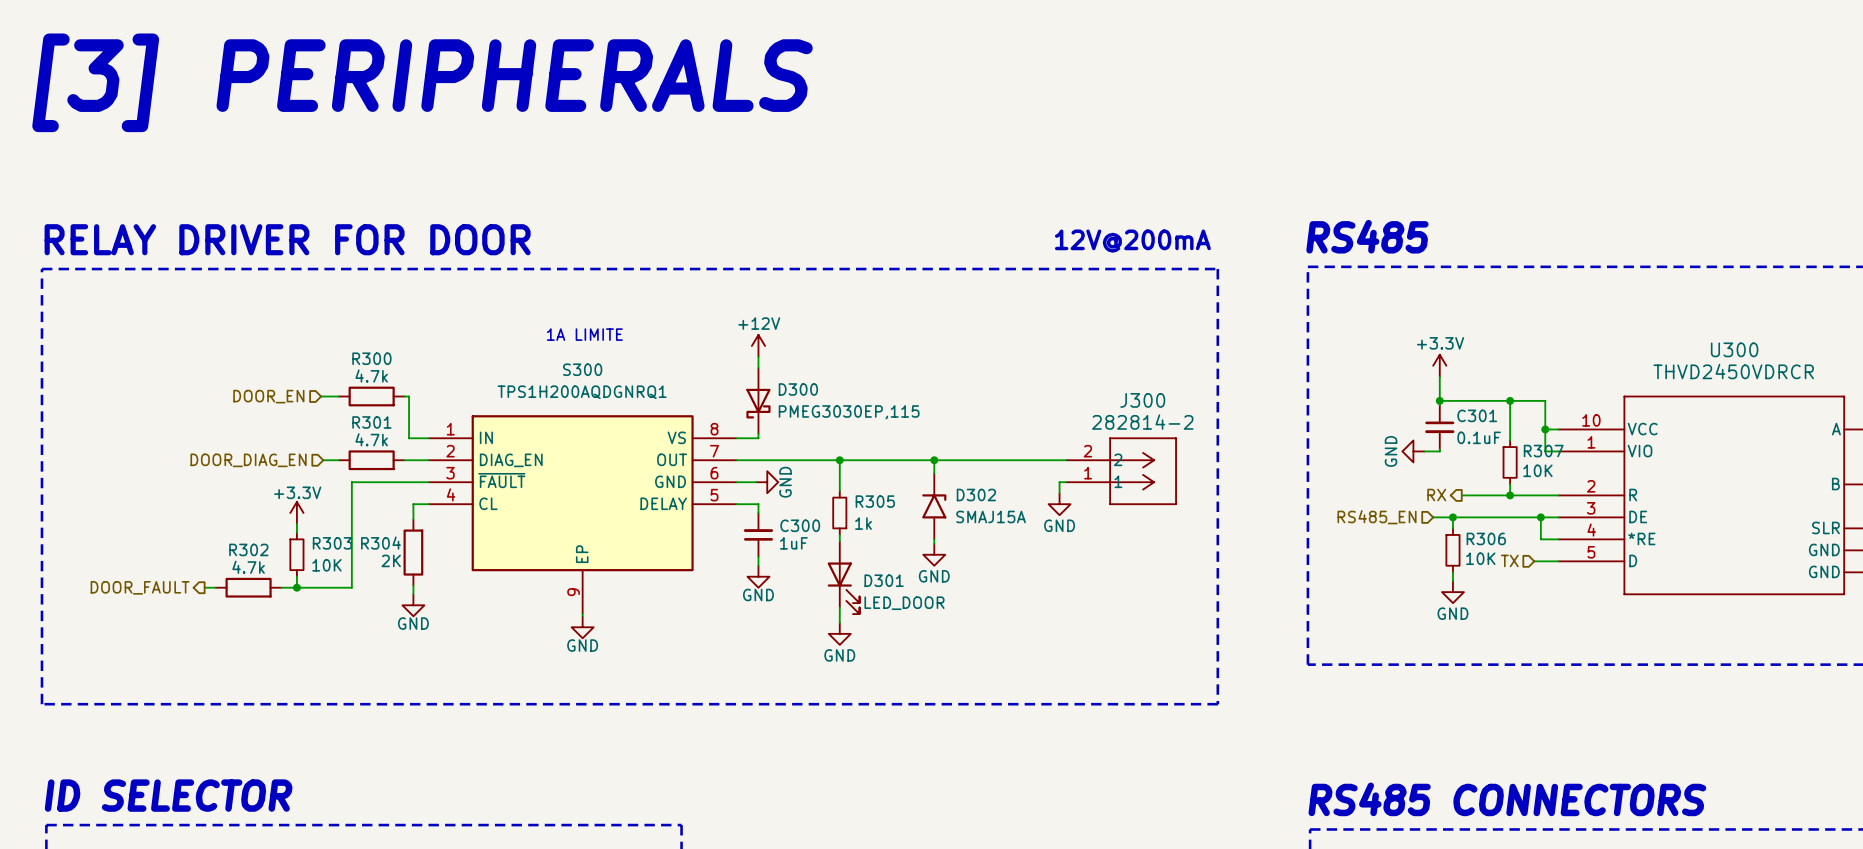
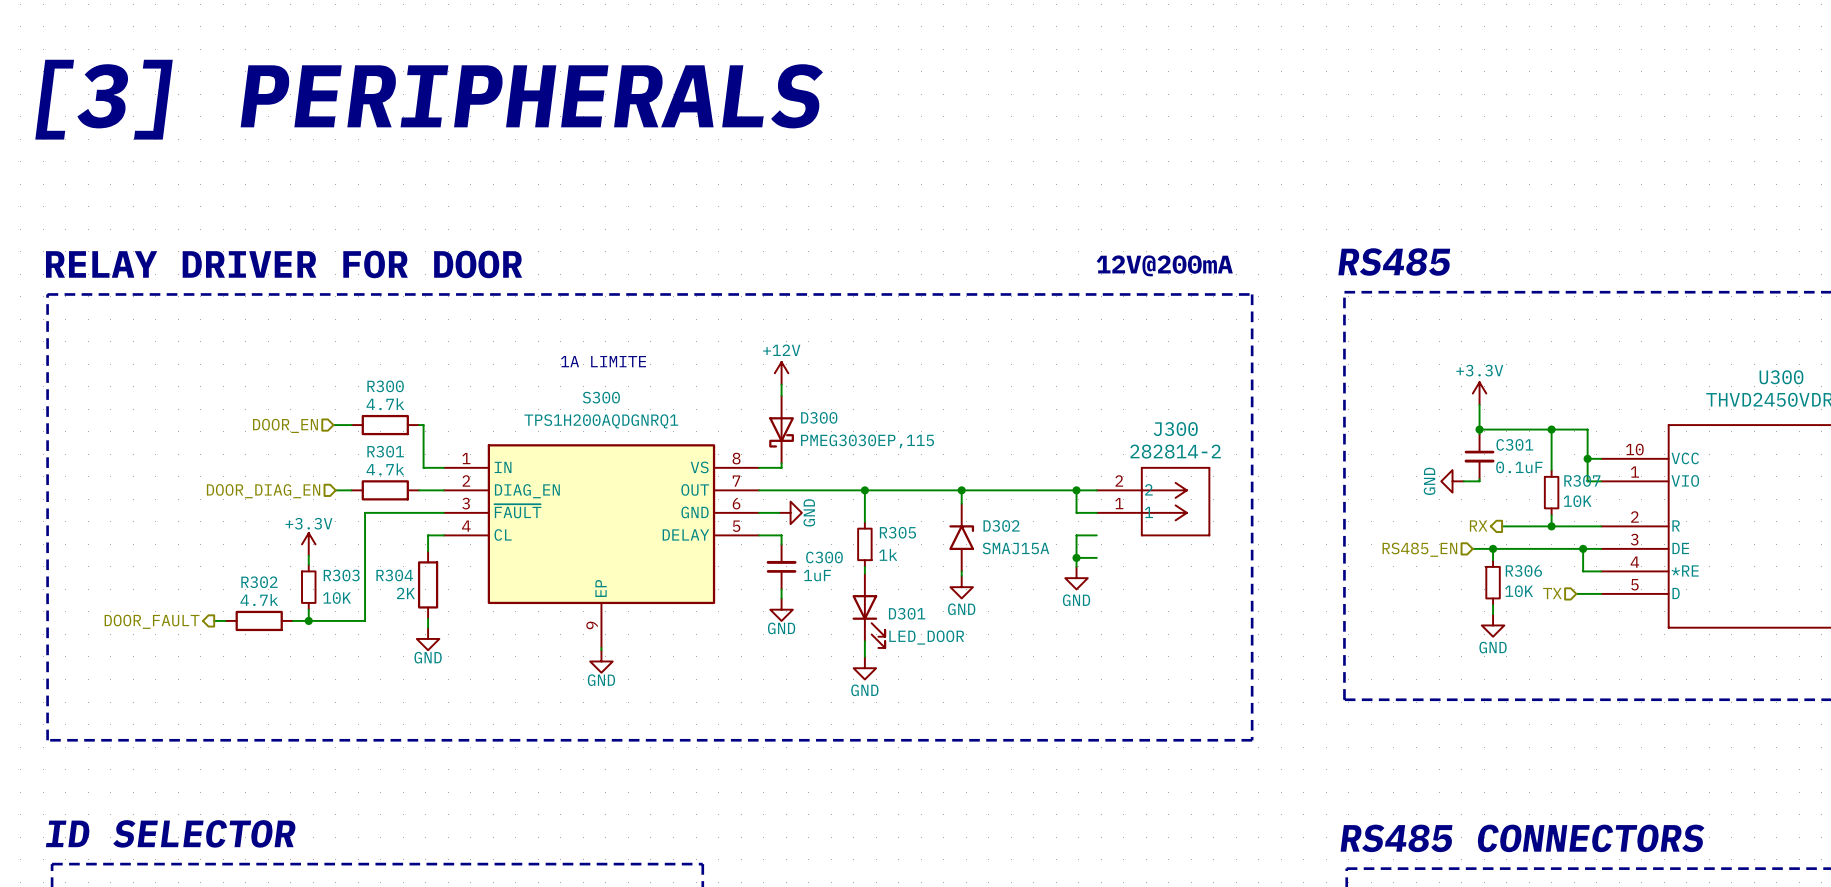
junction: none -> (1076, 490)
wire: (1059, 482) (1059, 493) -> (1090, 512) (1076, 512) (1076, 490)
power symbol position: GND (1059, 504) -> GND (1076, 578)
wire: none -> (1096, 535) (1076, 535) (1076, 566)
wire: none -> (1076, 557) (1096, 557)
junction: none -> (1076, 557)

